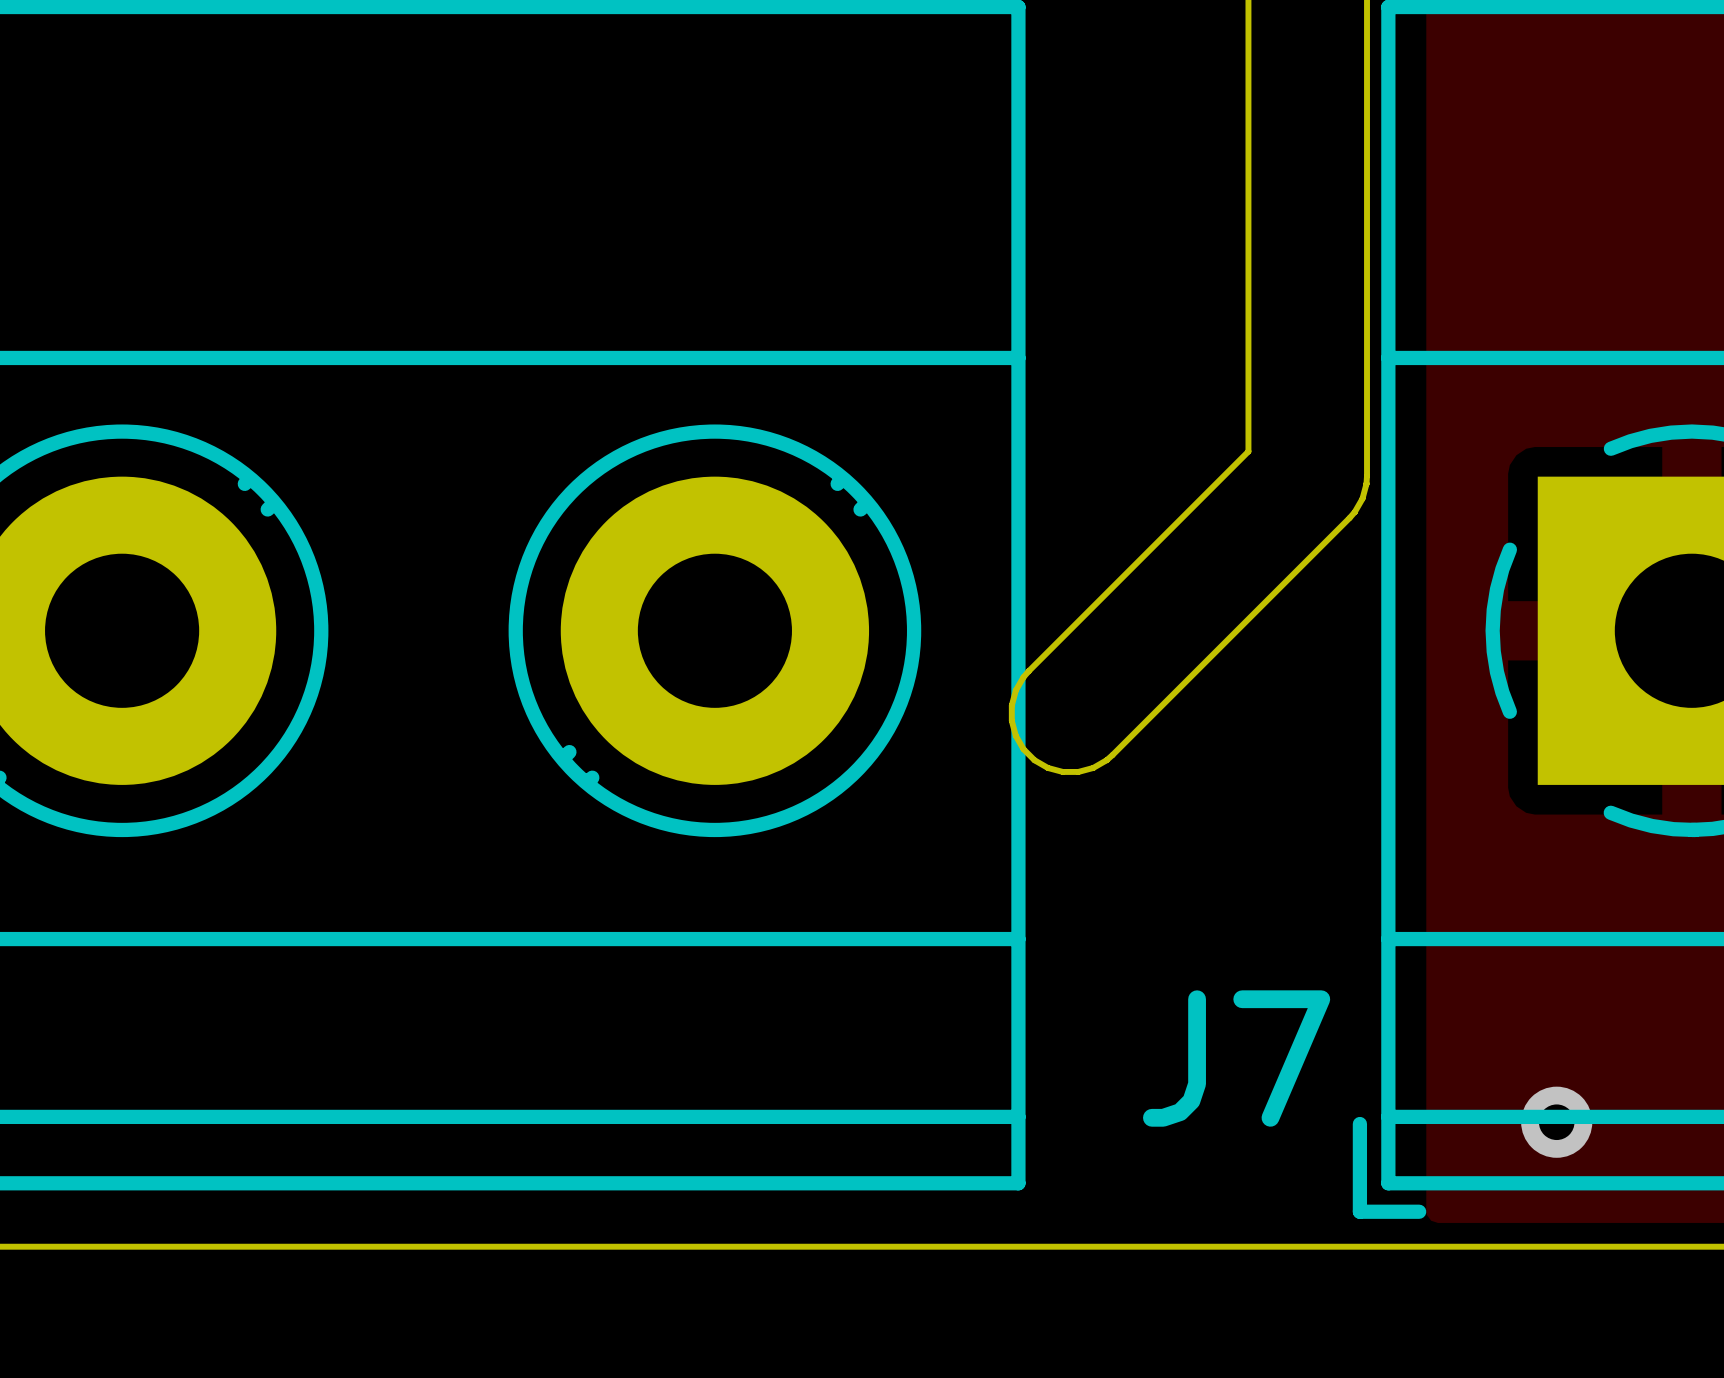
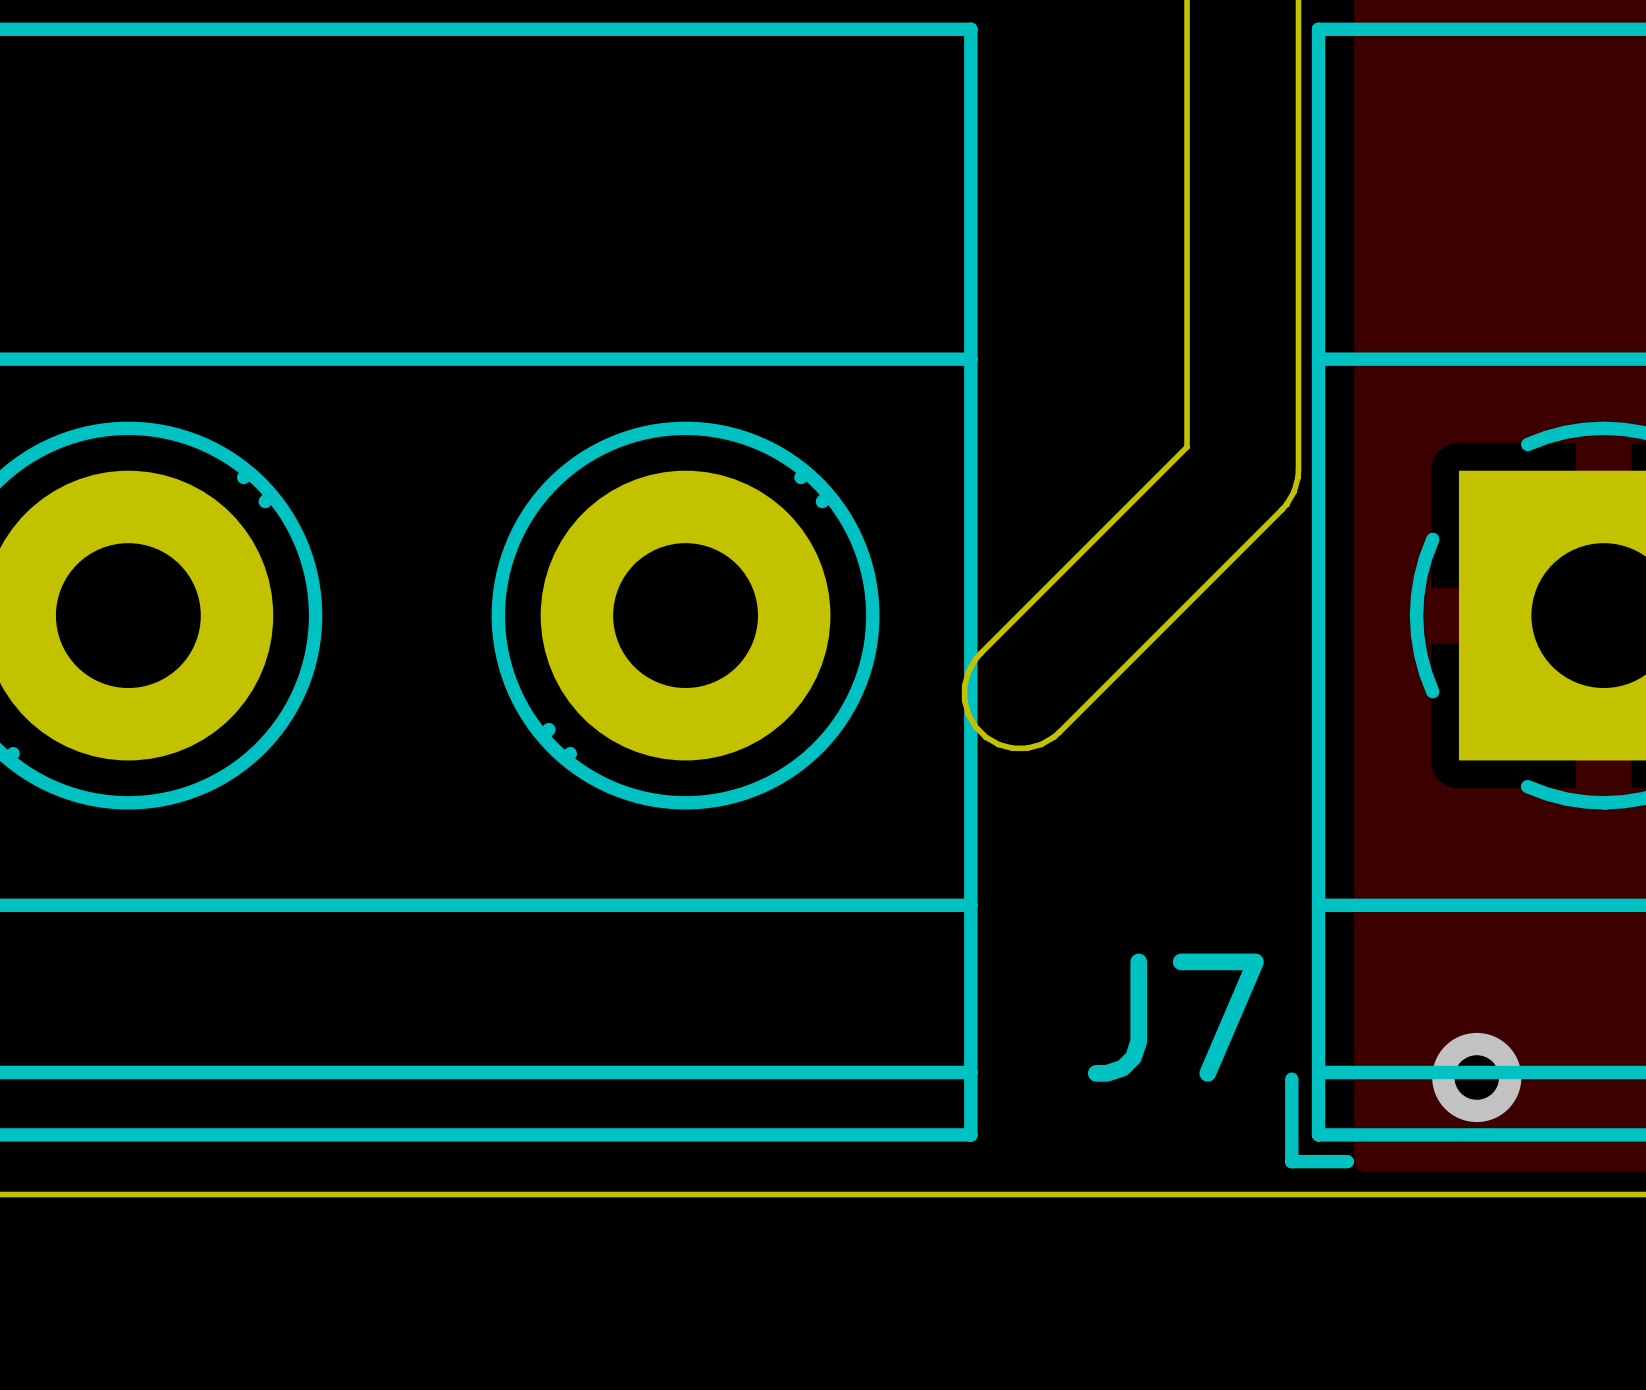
via size: [1521, 1086, 1593, 1158] -> [1432, 1032, 1522, 1123]

